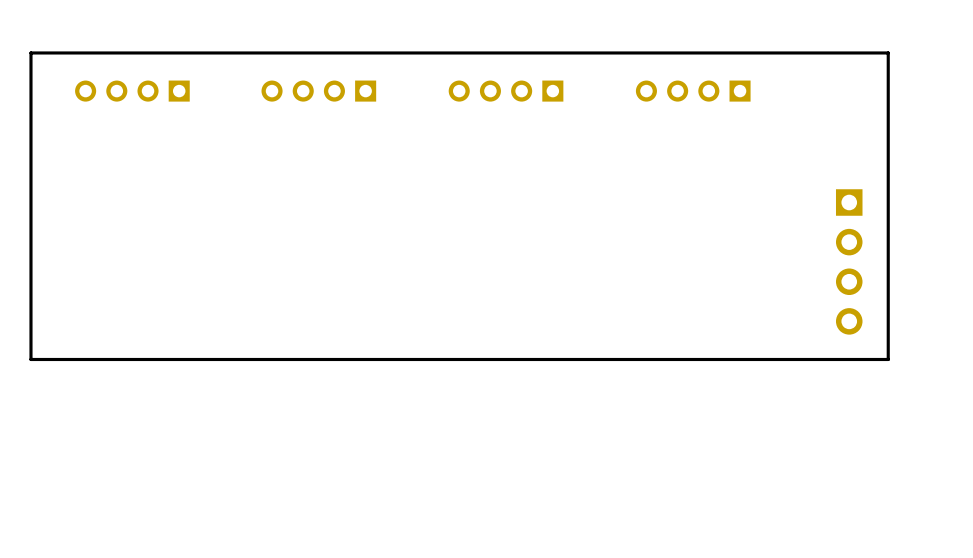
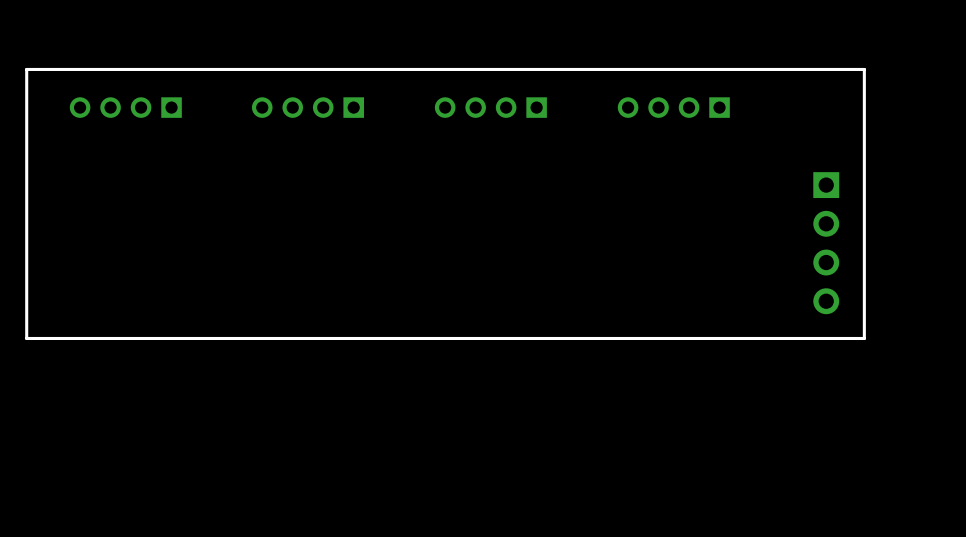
board edge: (888, 84) (888, 52) (30, 52) (30, 84) -> (864, 69) (26, 69)
part position: (132, 91) -> (125, 107)
part position: (318, 91) -> (307, 107)
part position: (506, 91) -> (490, 107)
part position: (693, 91) -> (673, 107)

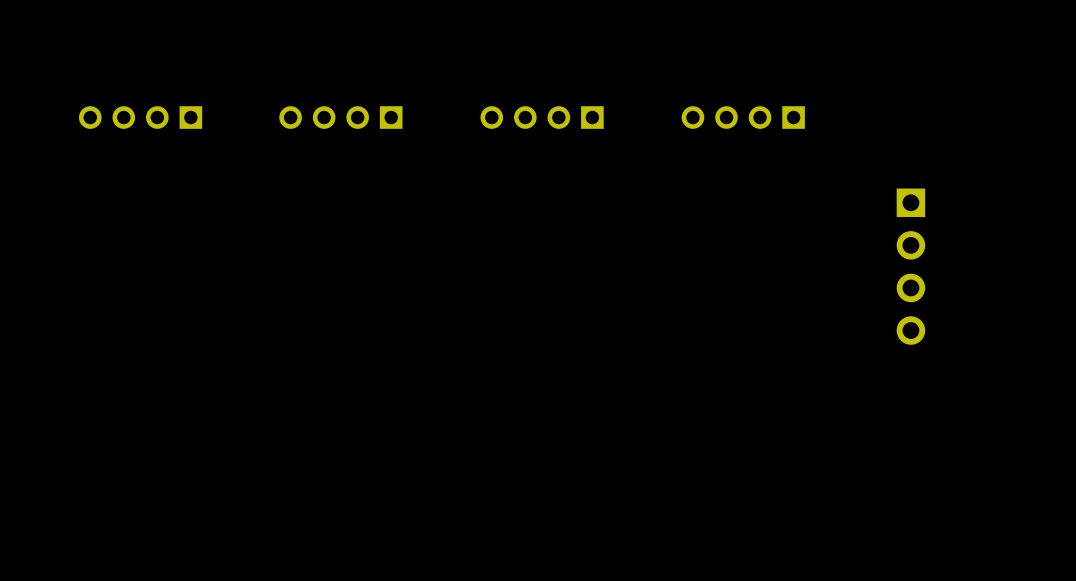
board edge: (864, 69) (26, 69) (26, 338) (864, 338) (864, 69) -> none

